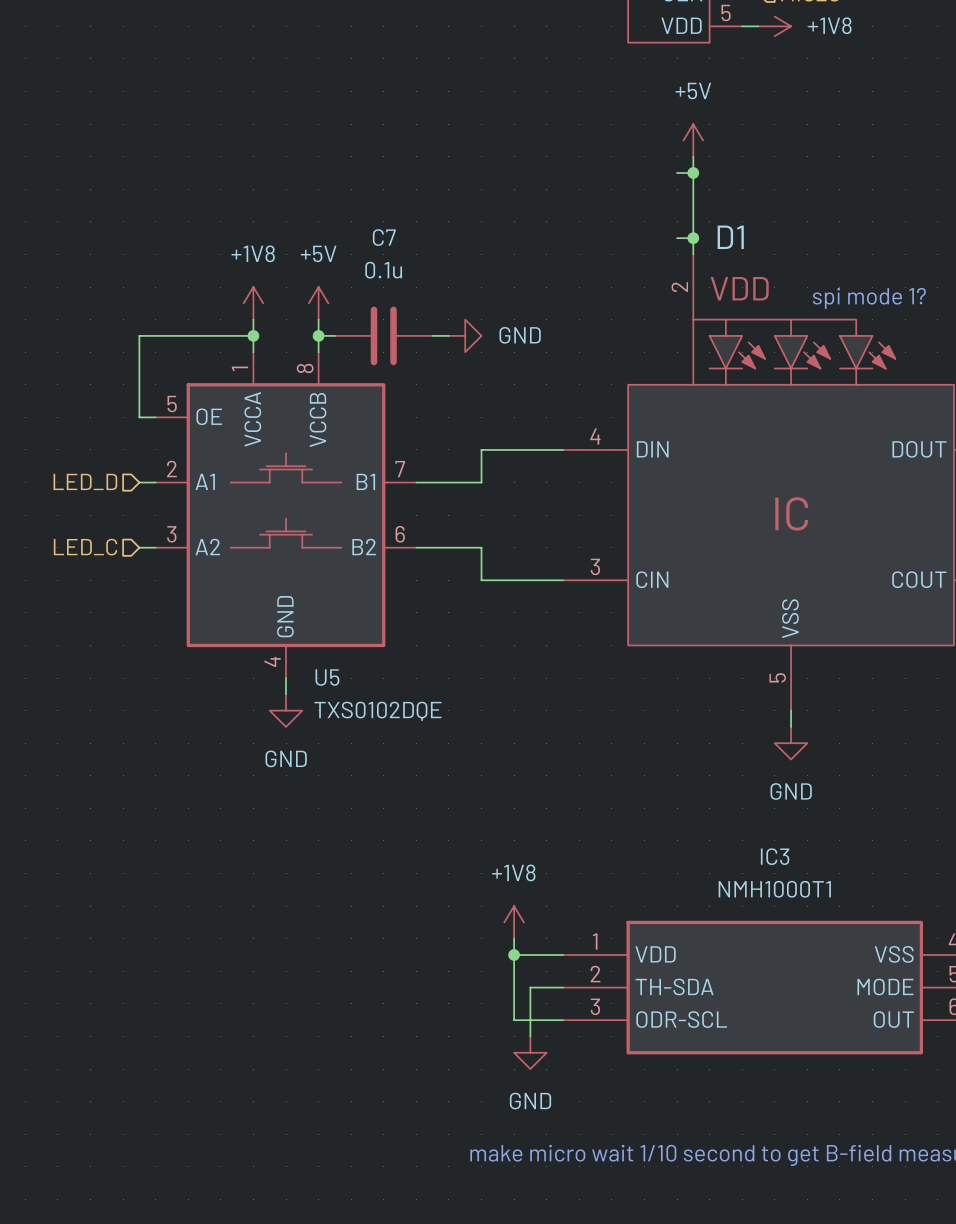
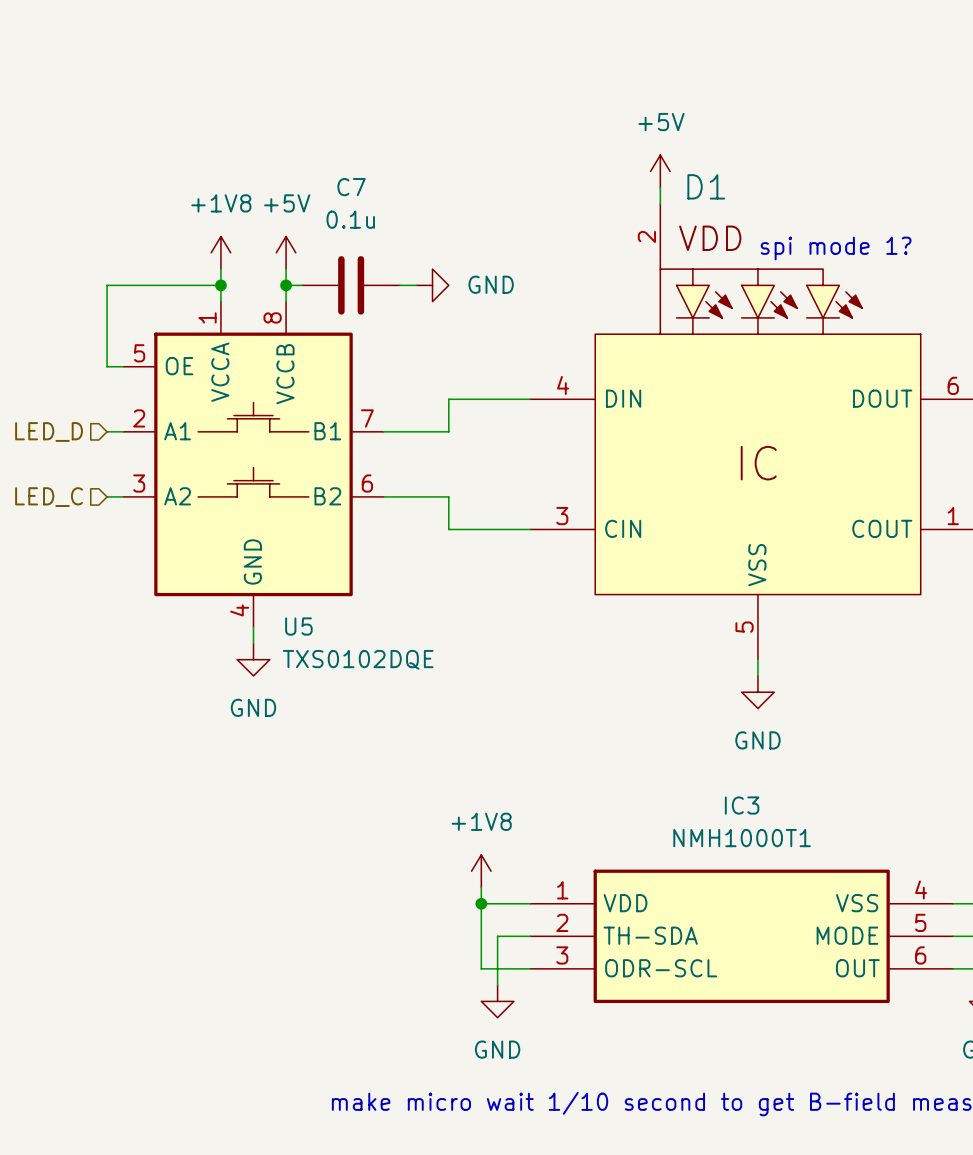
power symbol position: +5V (693, 140) -> +5V (660, 171)
wire: (693, 156) (693, 238) (677, 238) -> none
junction: (693, 172) -> none
junction: (693, 238) -> none

